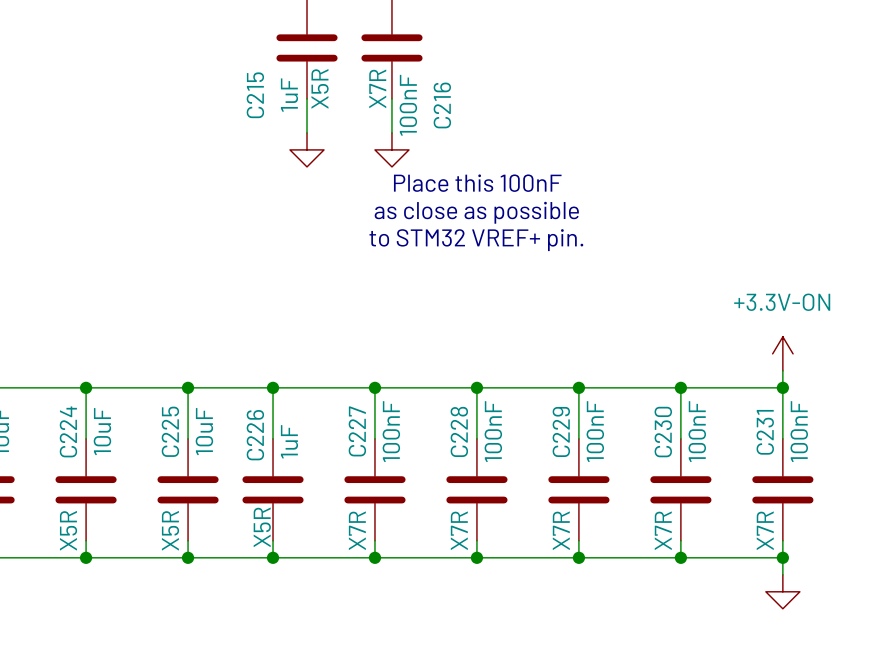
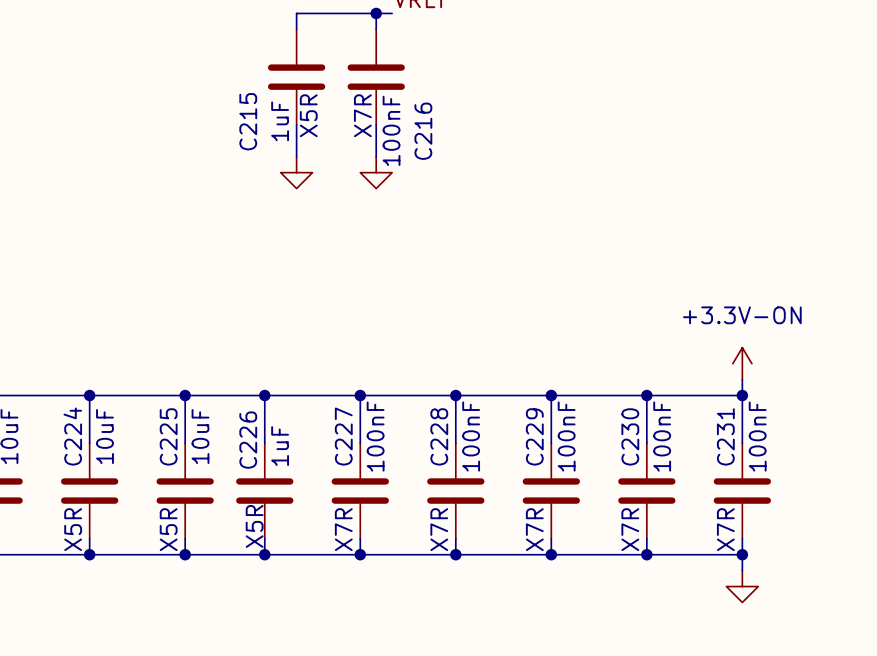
text: Place this 100nF (477, 183) -> none
text: as close as possible (476, 212) -> none
text: to STM32 VREF+ pin. (476, 240) -> none

